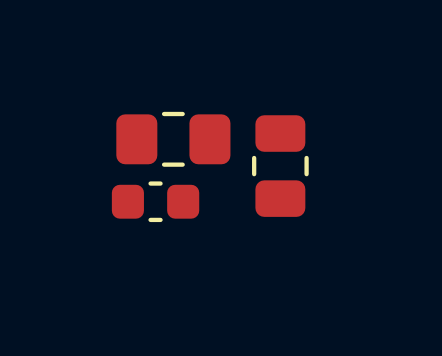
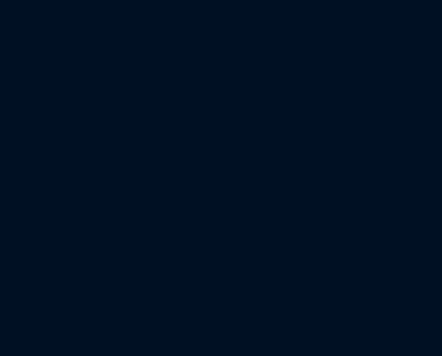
part: (173, 139) -> none
part: (280, 166) -> none
part: (155, 201) -> none

